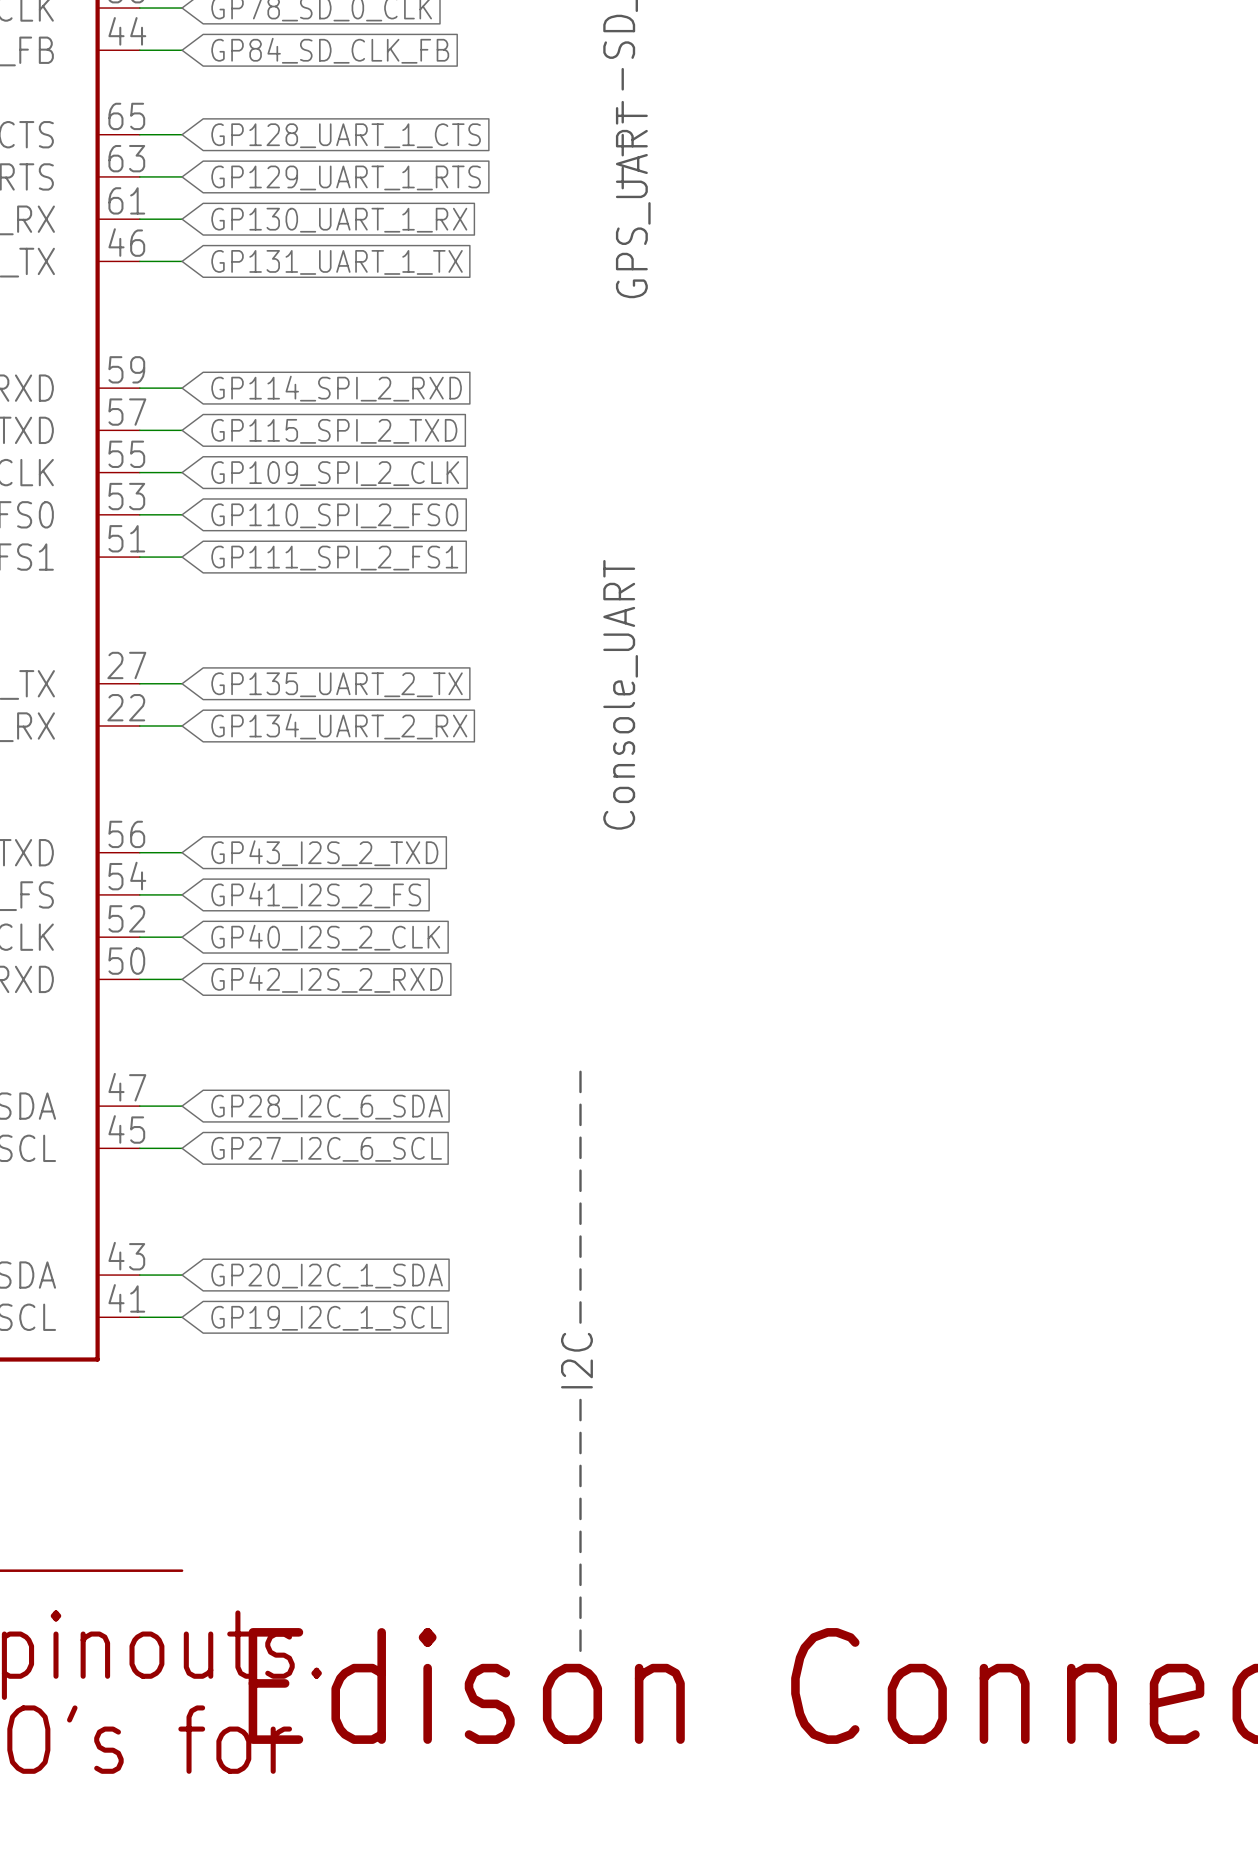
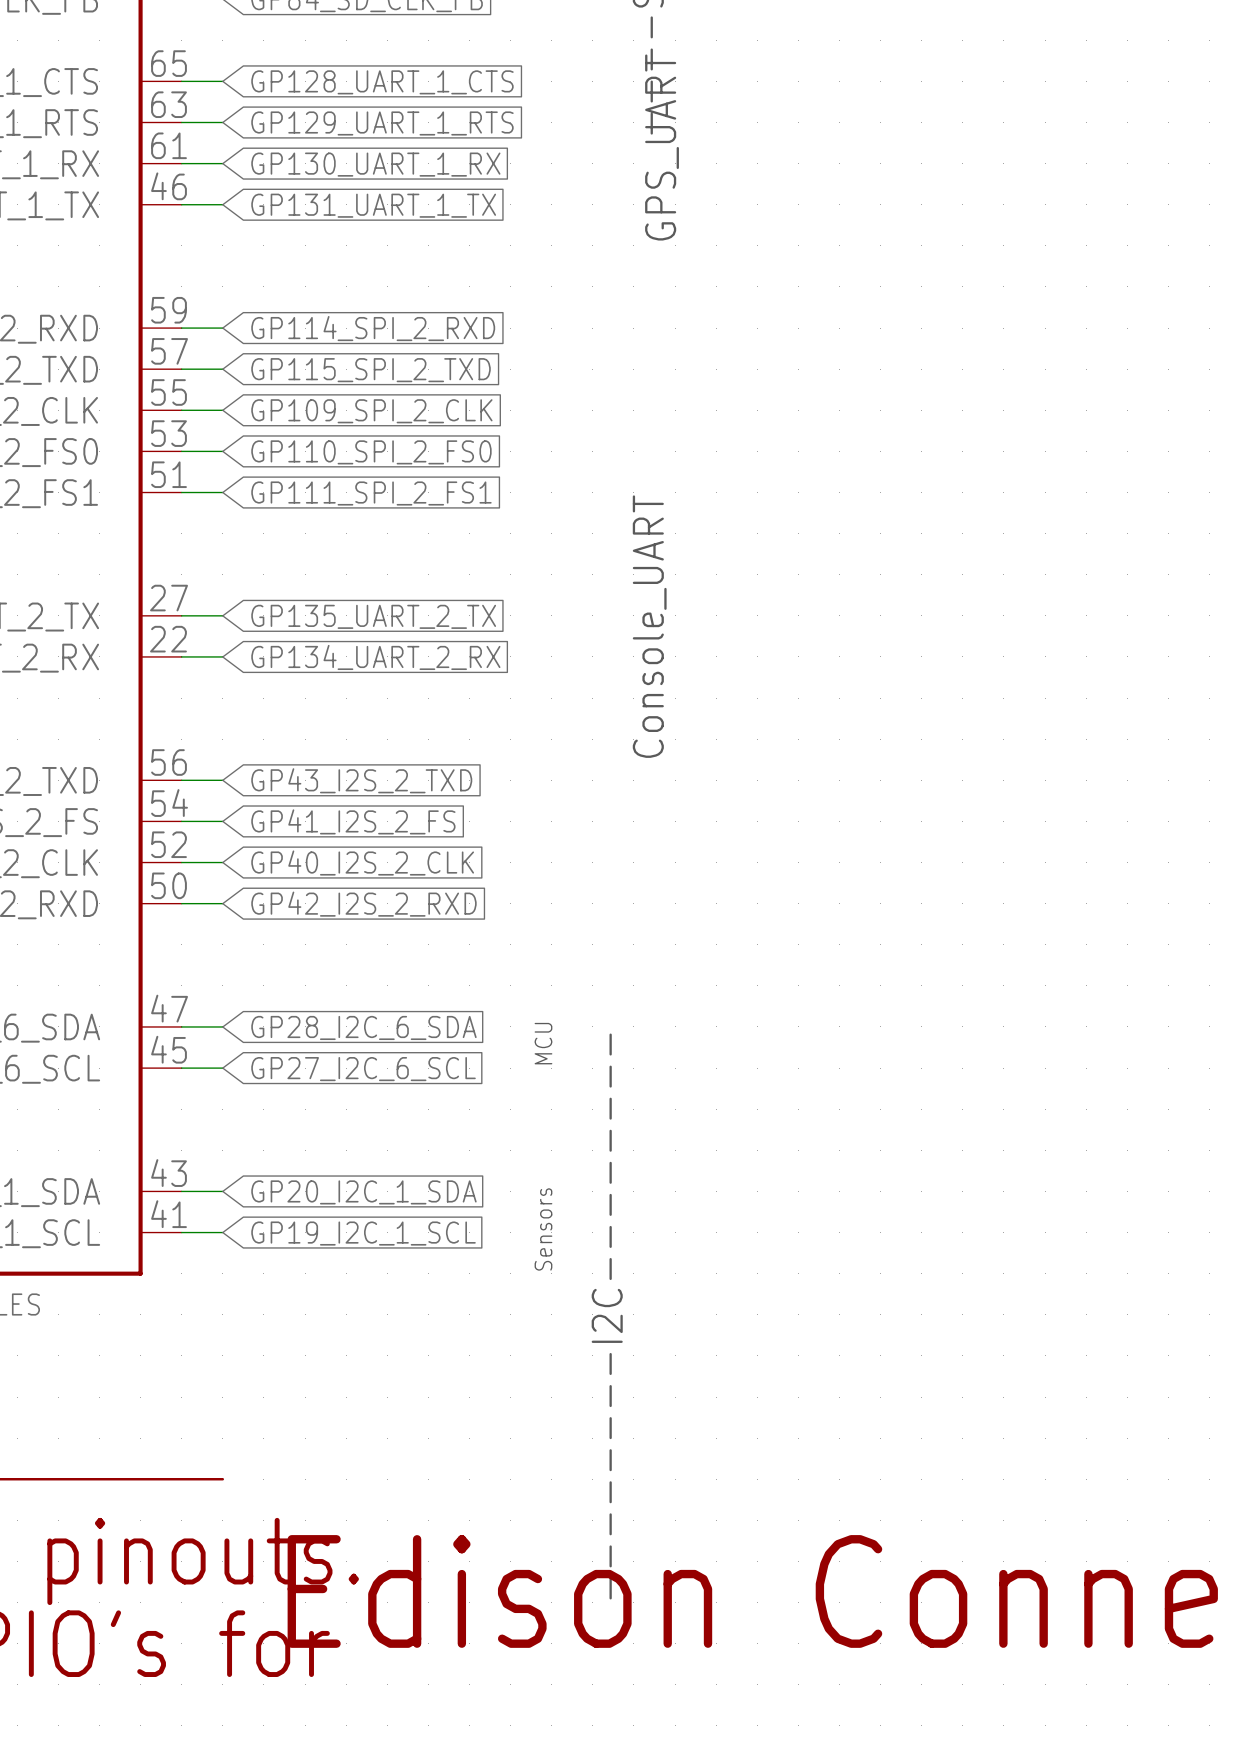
text: none -> MCU (543, 1043)
text: none -> Sensors (543, 1229)
text position: --------I2C-------- (576, 1361) -> --------I2C-------- (607, 1316)

